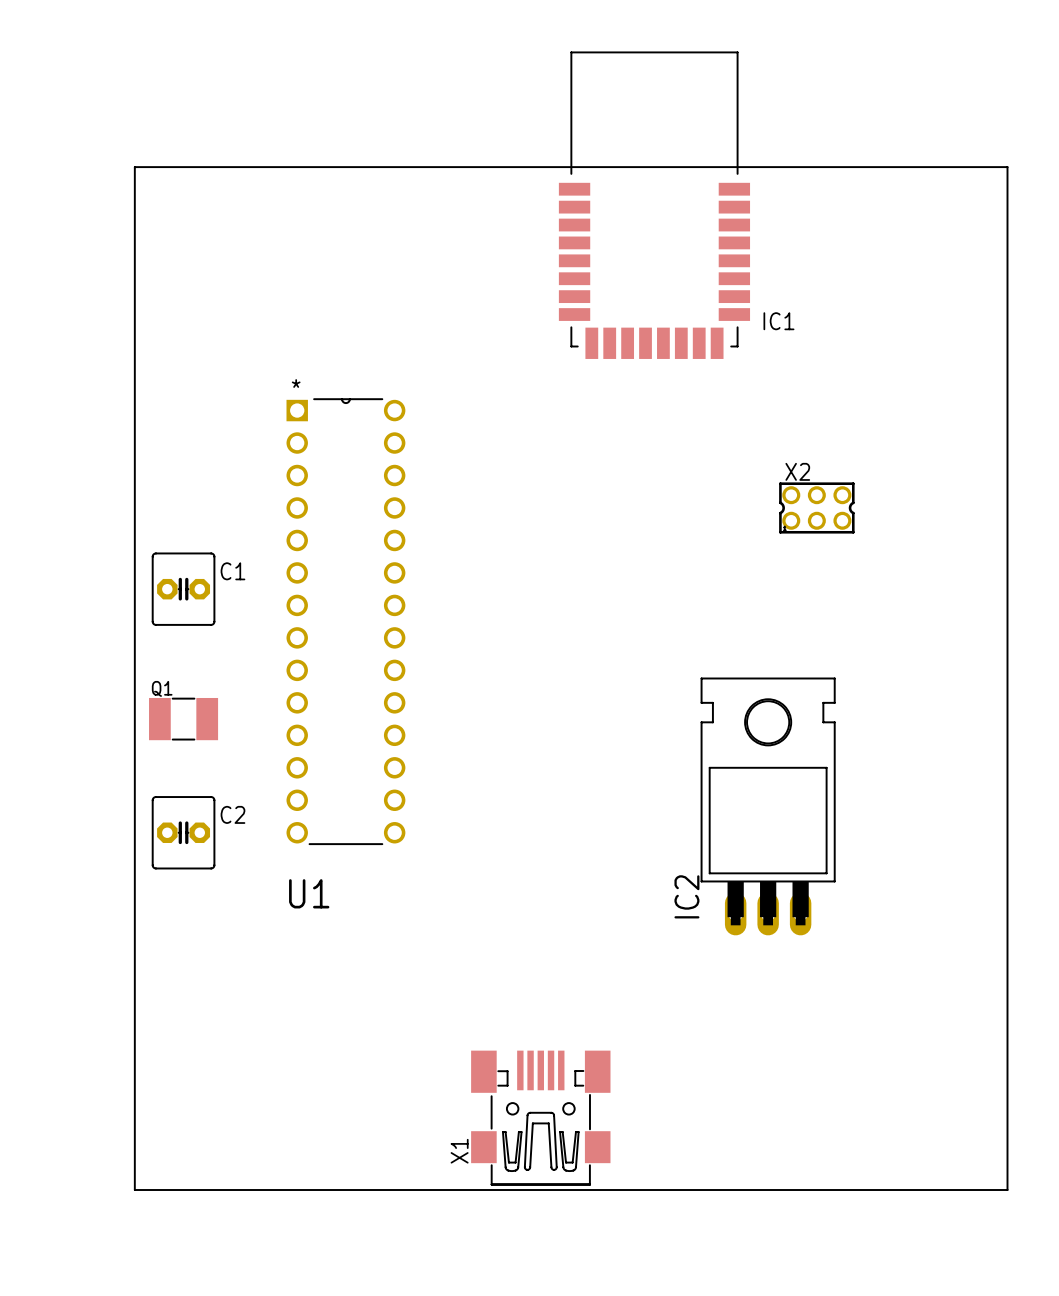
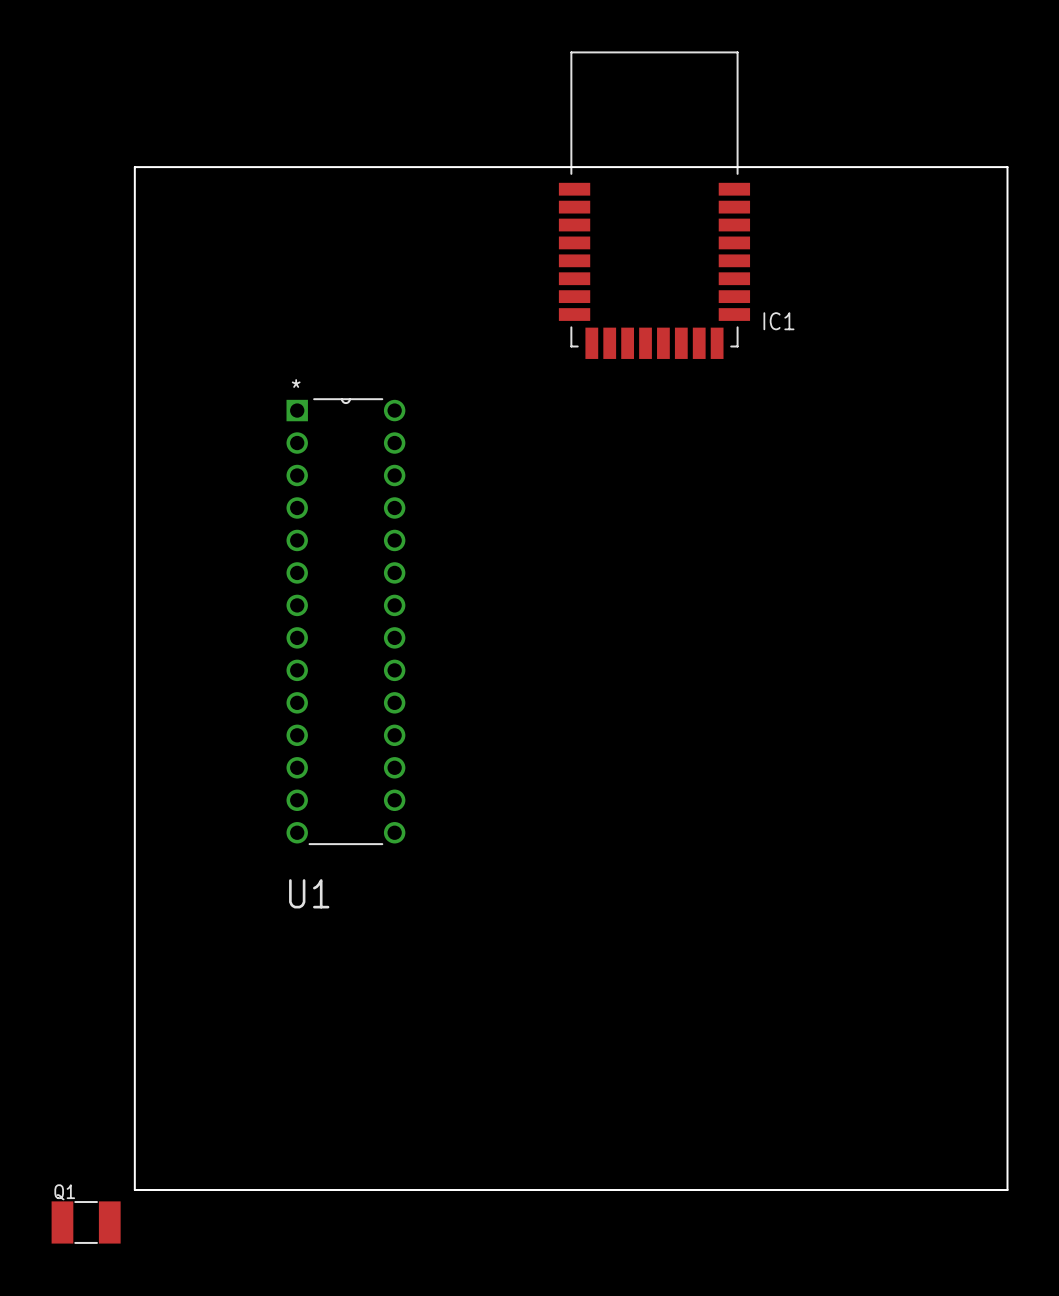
X2: (816, 507) -> none
C1: (183, 589) -> none
Q1 position: (183, 719) -> (86, 1222)
IC2: (768, 806) -> none
C2: (183, 832) -> none
X1: (540, 1117) -> none

